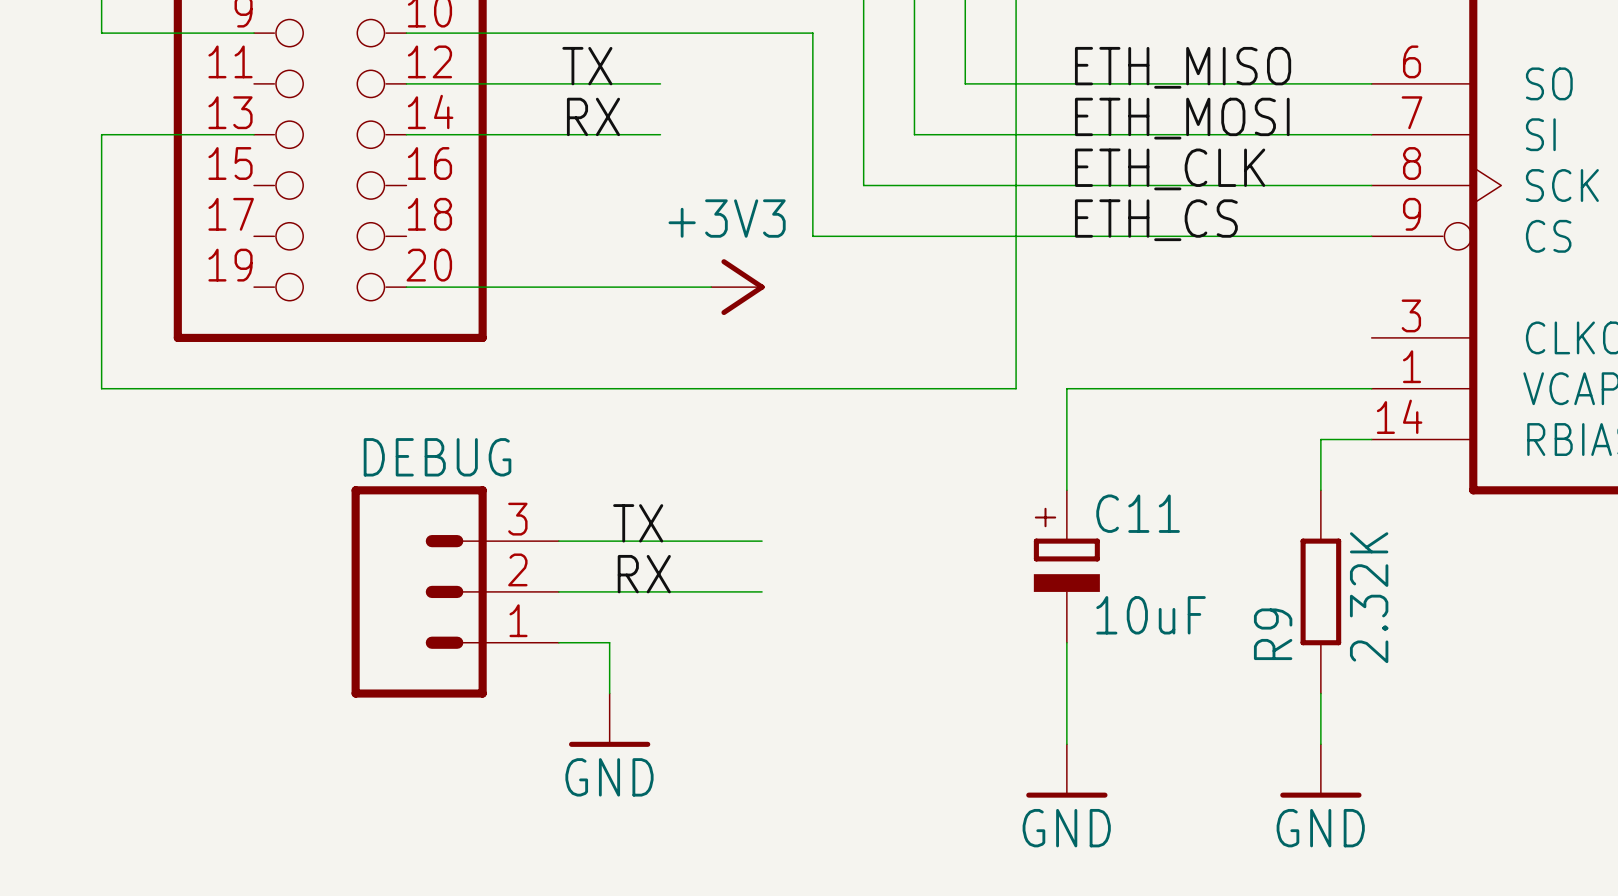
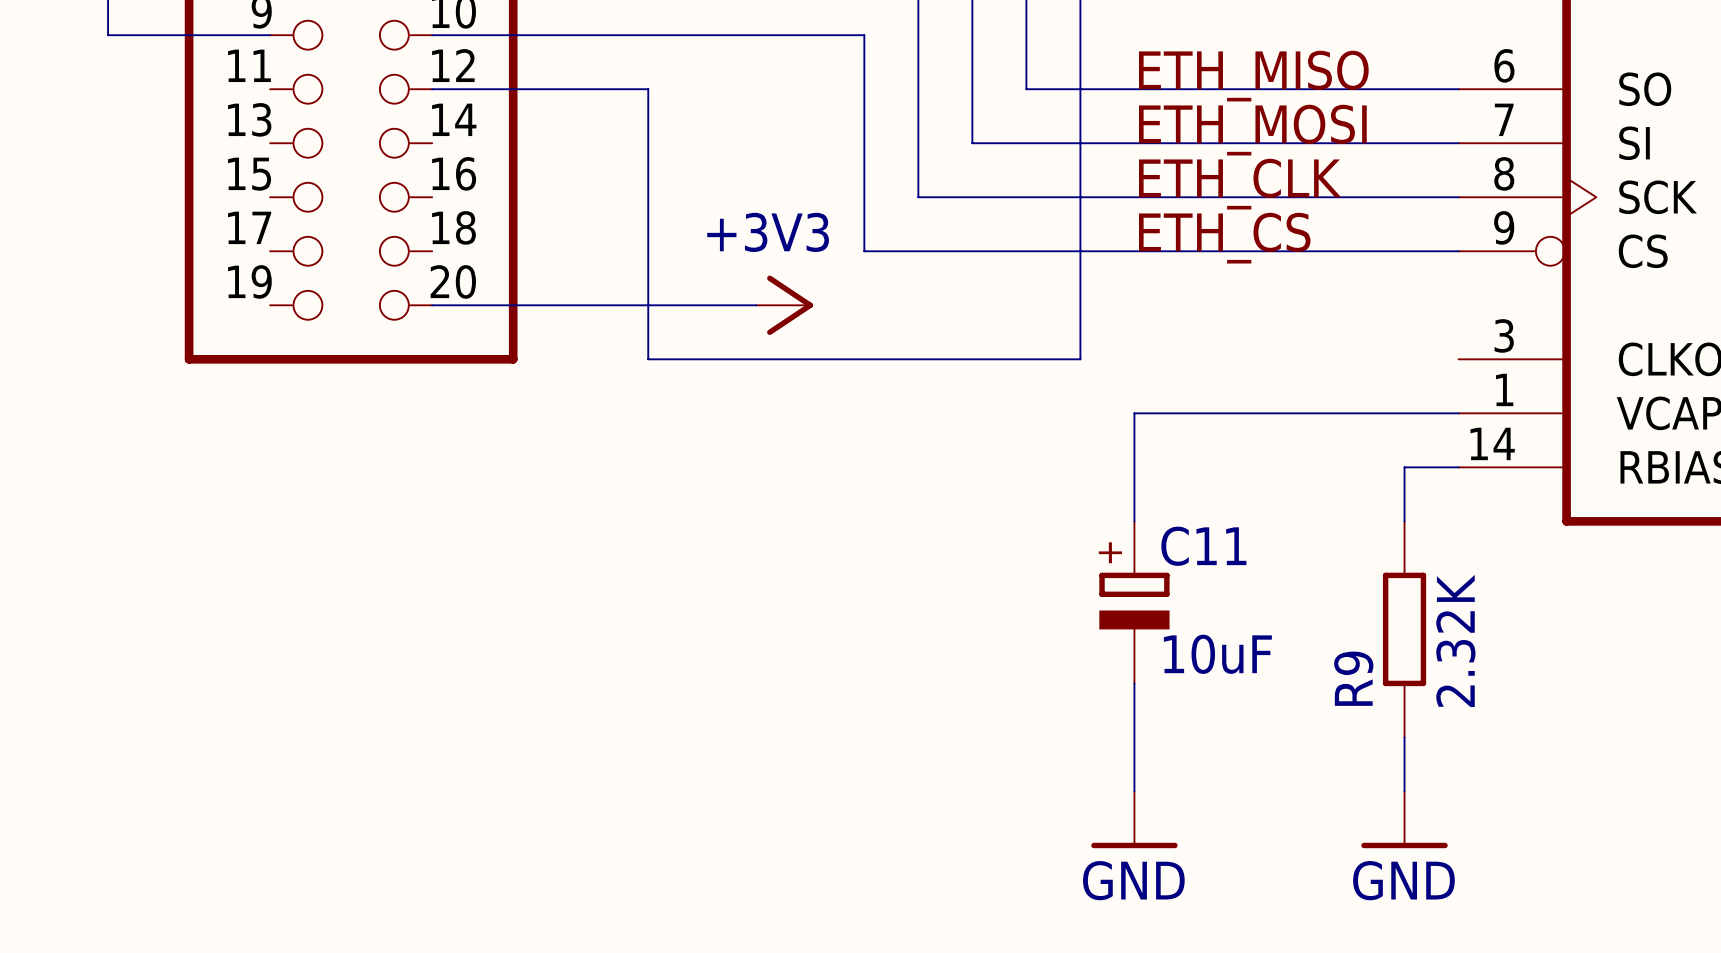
label: TX (587, 66) -> none
wire: (609, 83) (660, 83) -> none
label: RX (593, 116) -> none
wire: (254, 134) (101, 134) (101, 388) (1016, 388) (1016, 337) -> (648, 89) (648, 359) (1080, 359)
wire: (406, 134) (660, 134) -> none
label: TX (638, 523) -> none
wire: (558, 541) (762, 541) -> none
label: RX (644, 574) -> none
DEBUG: (455, 591) -> none
wire: (558, 591) (762, 591) -> none
wire: (558, 642) (609, 642) (609, 693) -> none
power symbol: GND (609, 720) -> none

